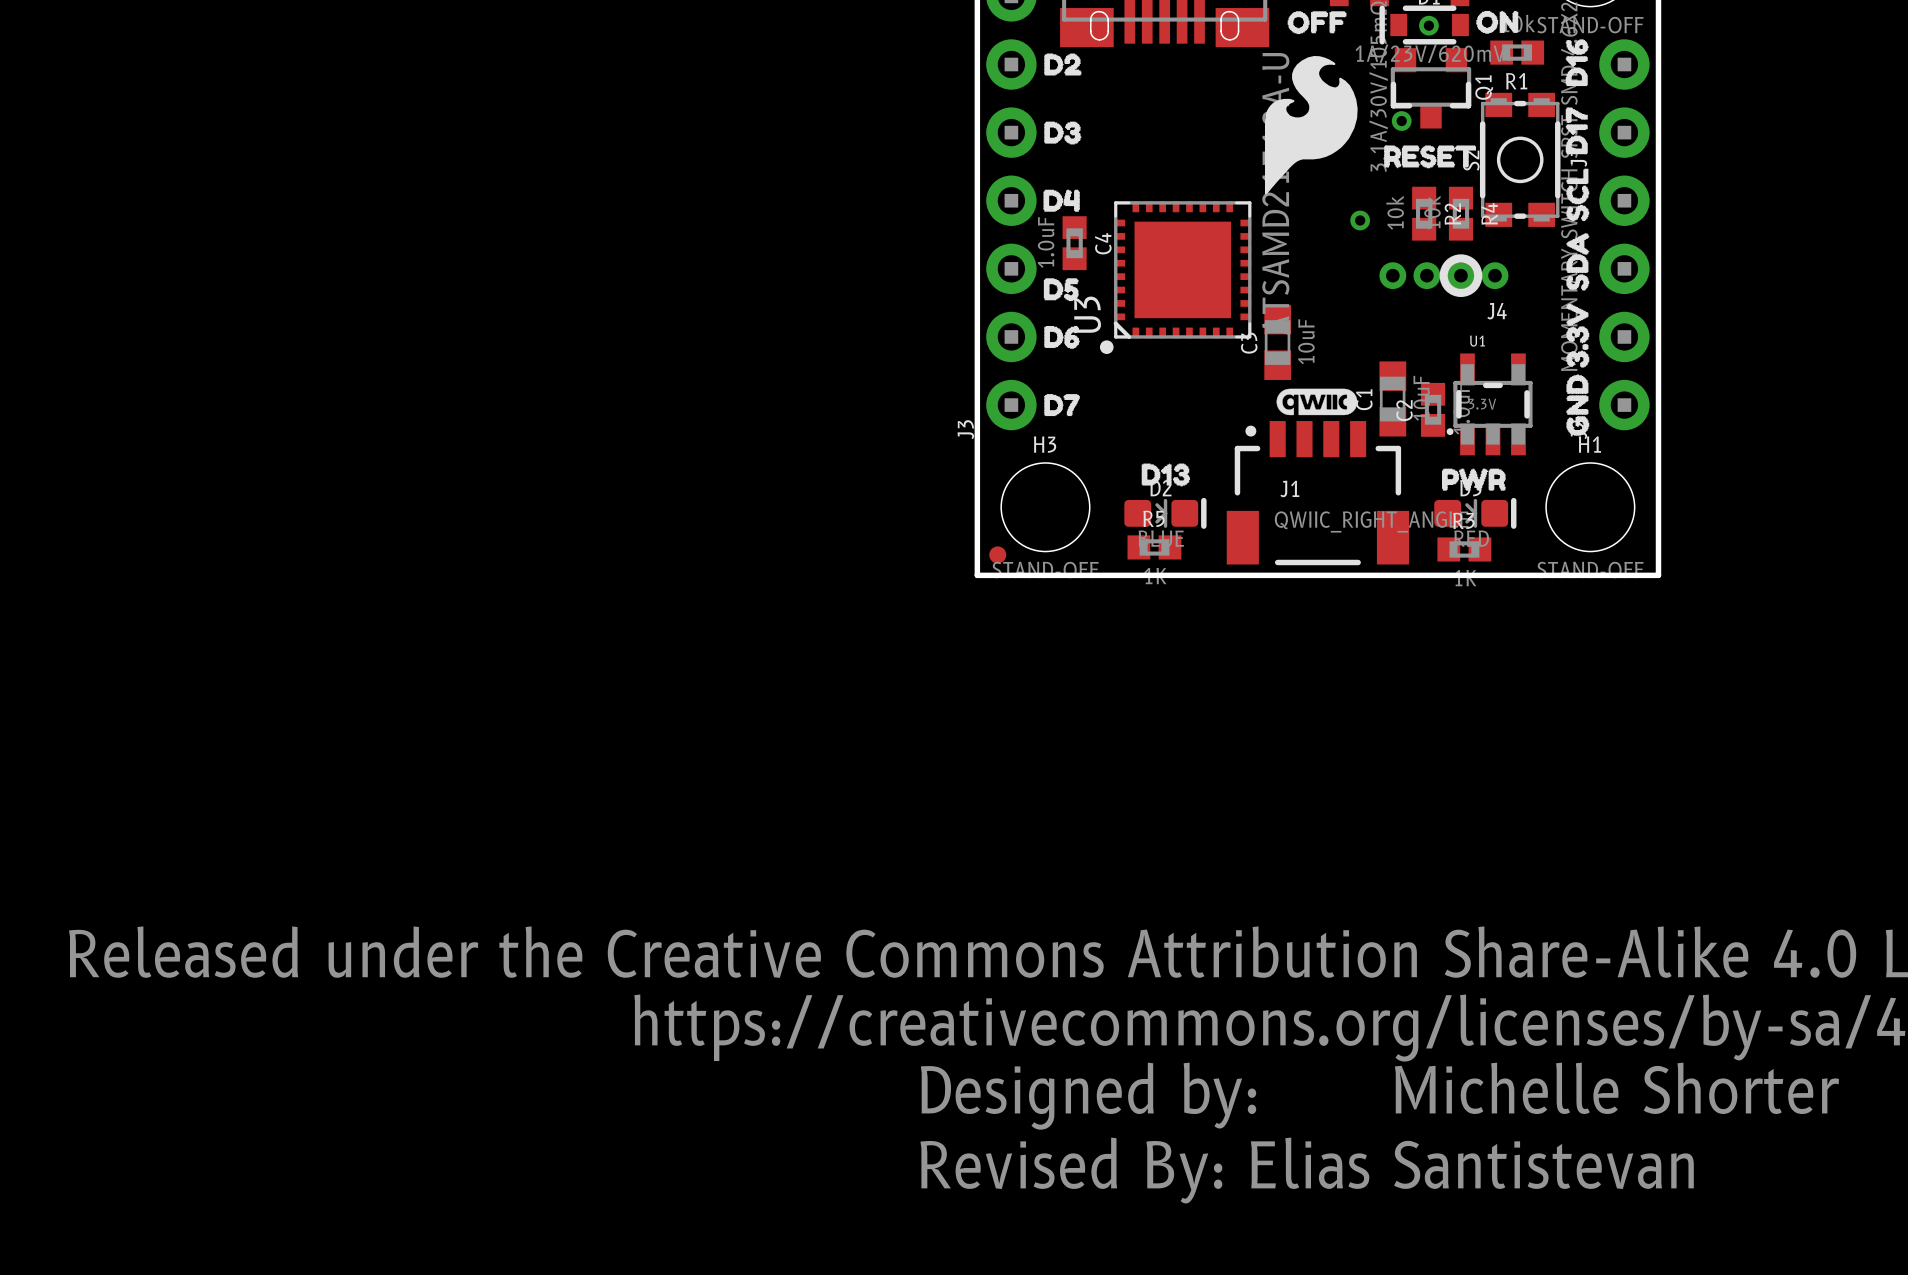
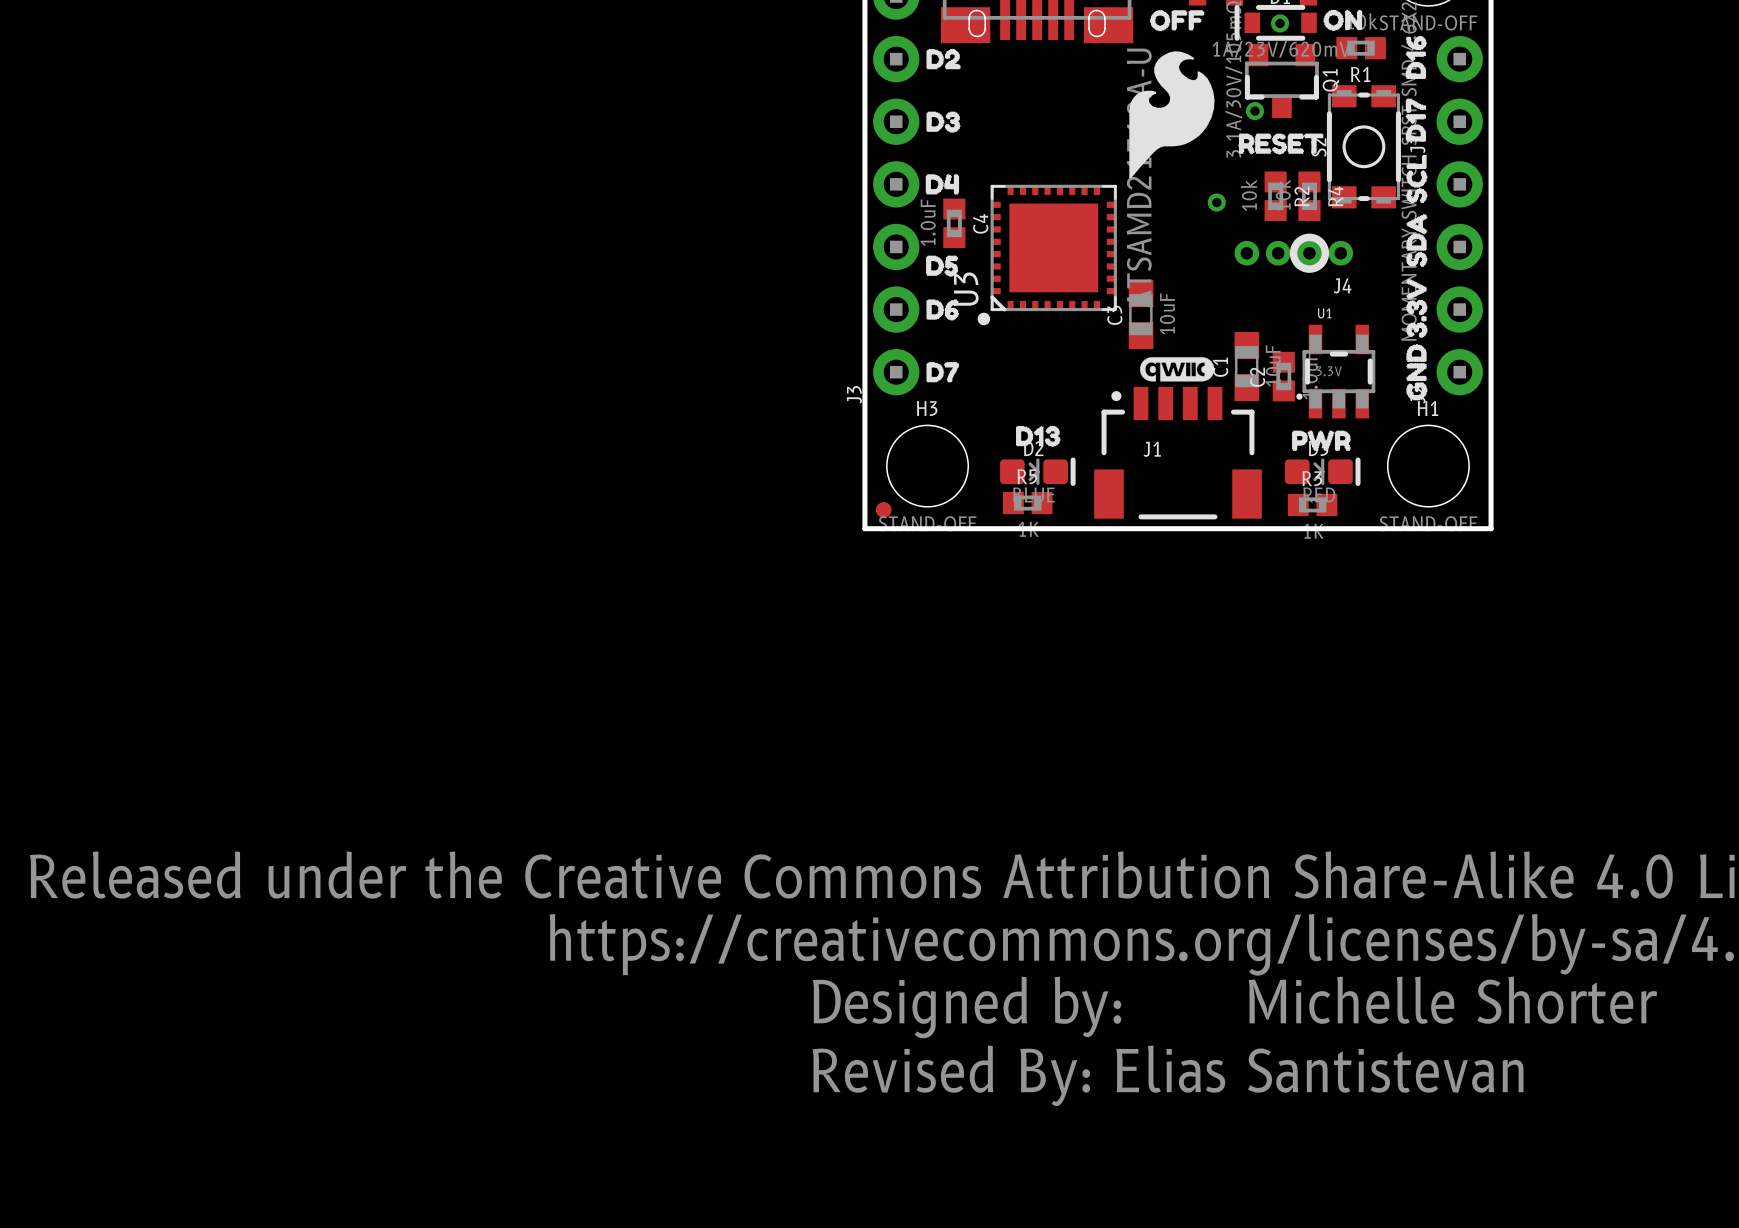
J1 value: QWIIC_RIGHT_ANGLE (1371, 521) -> none

